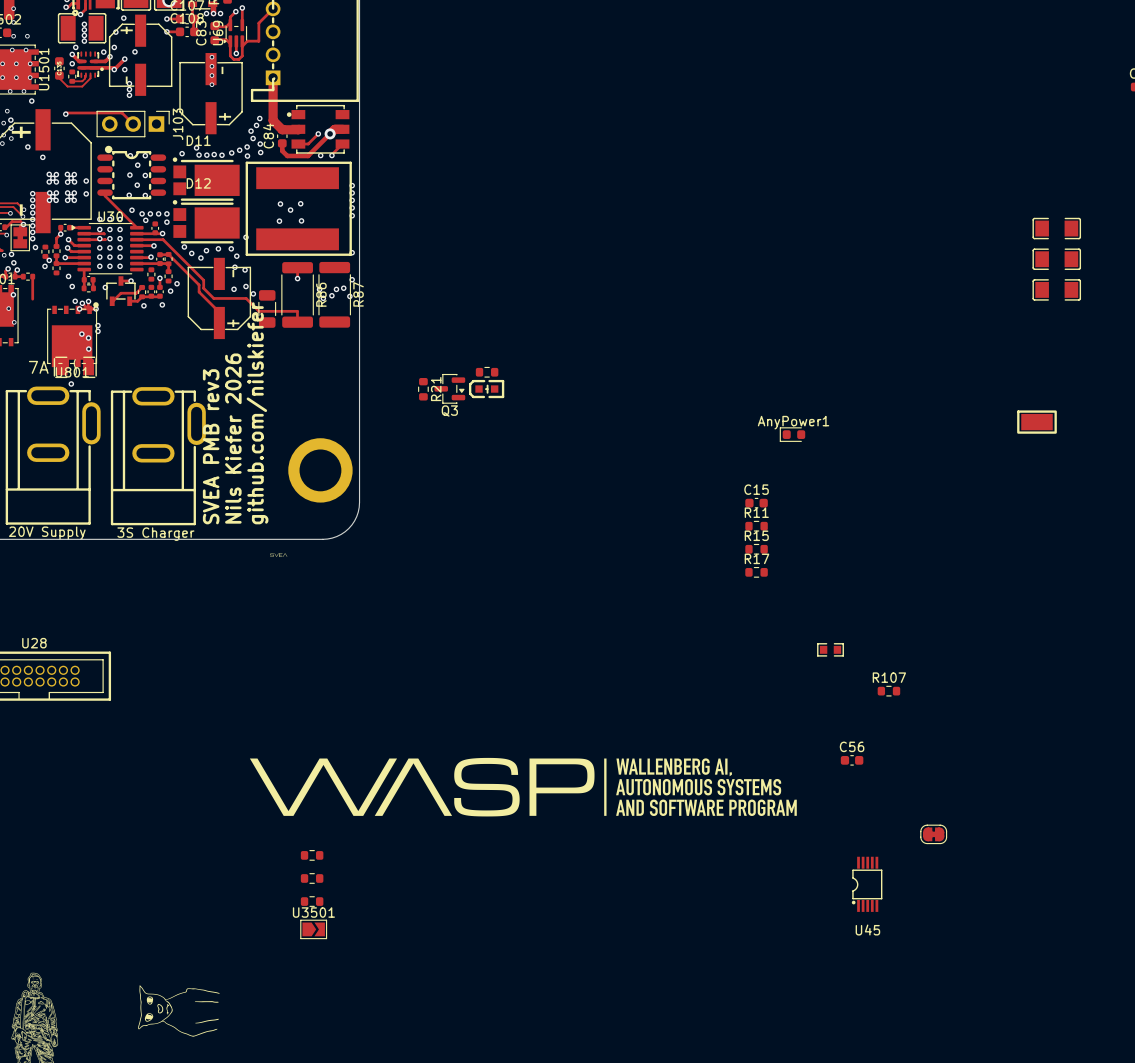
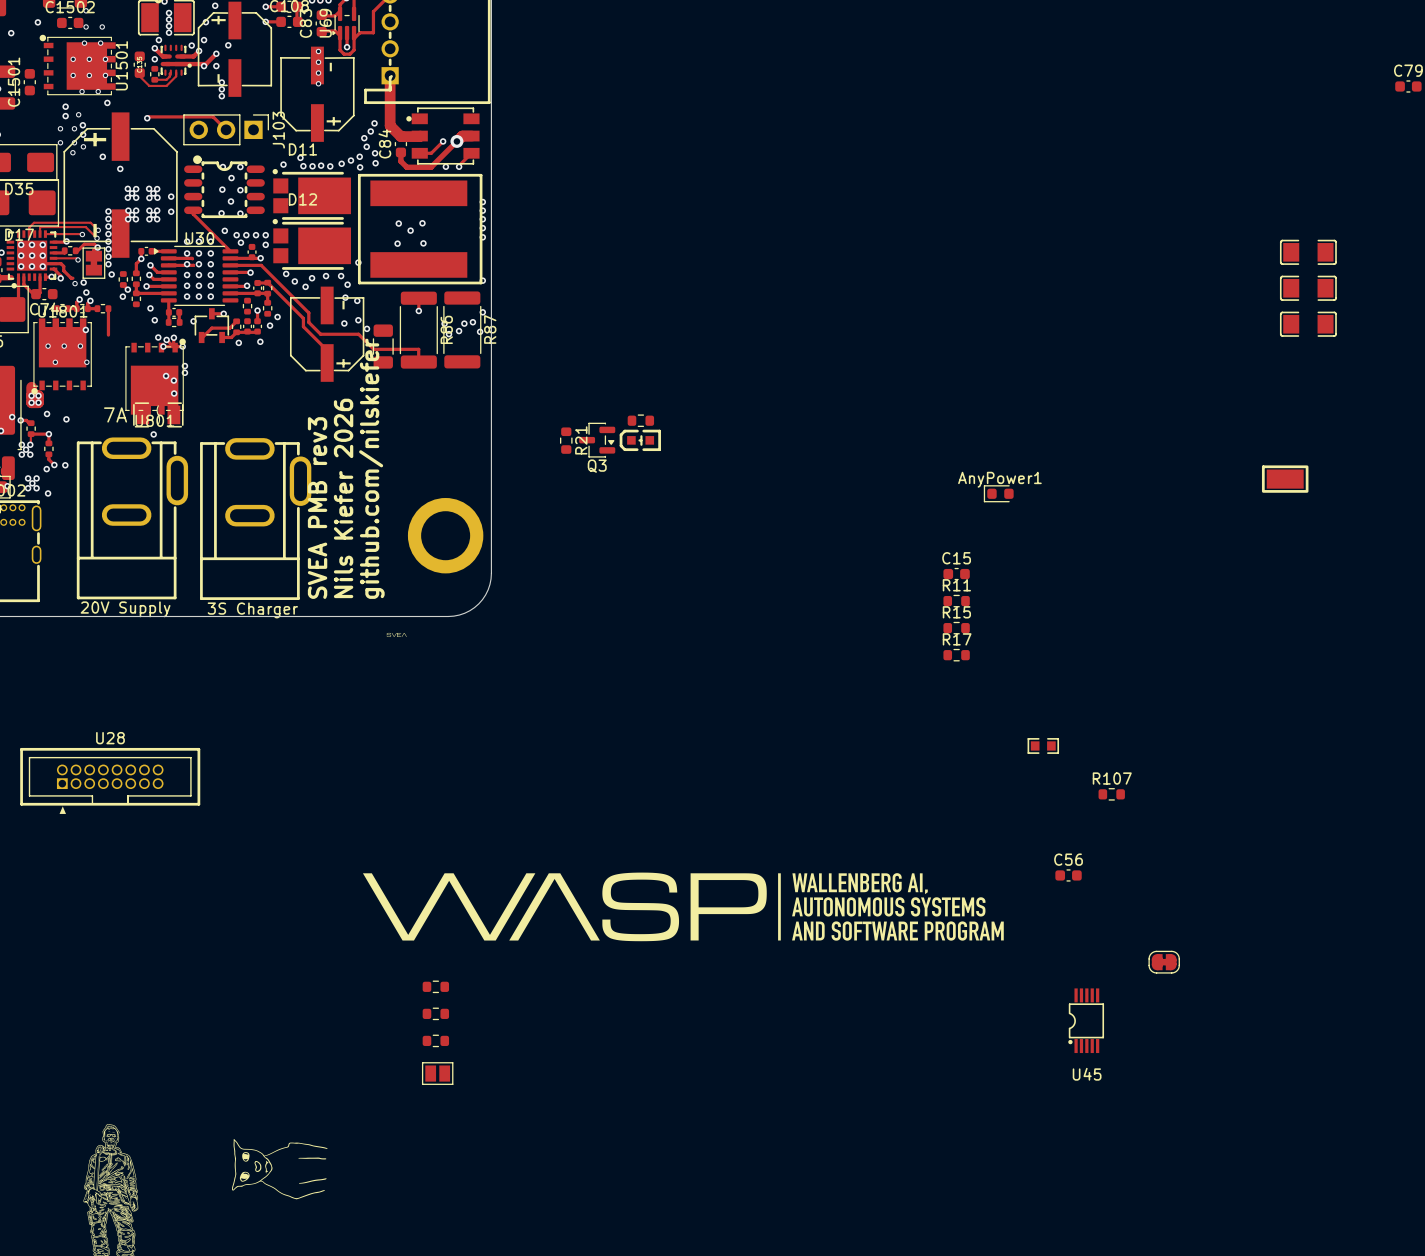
U3501: (313, 929) -> none
part: none -> (437, 1073)

